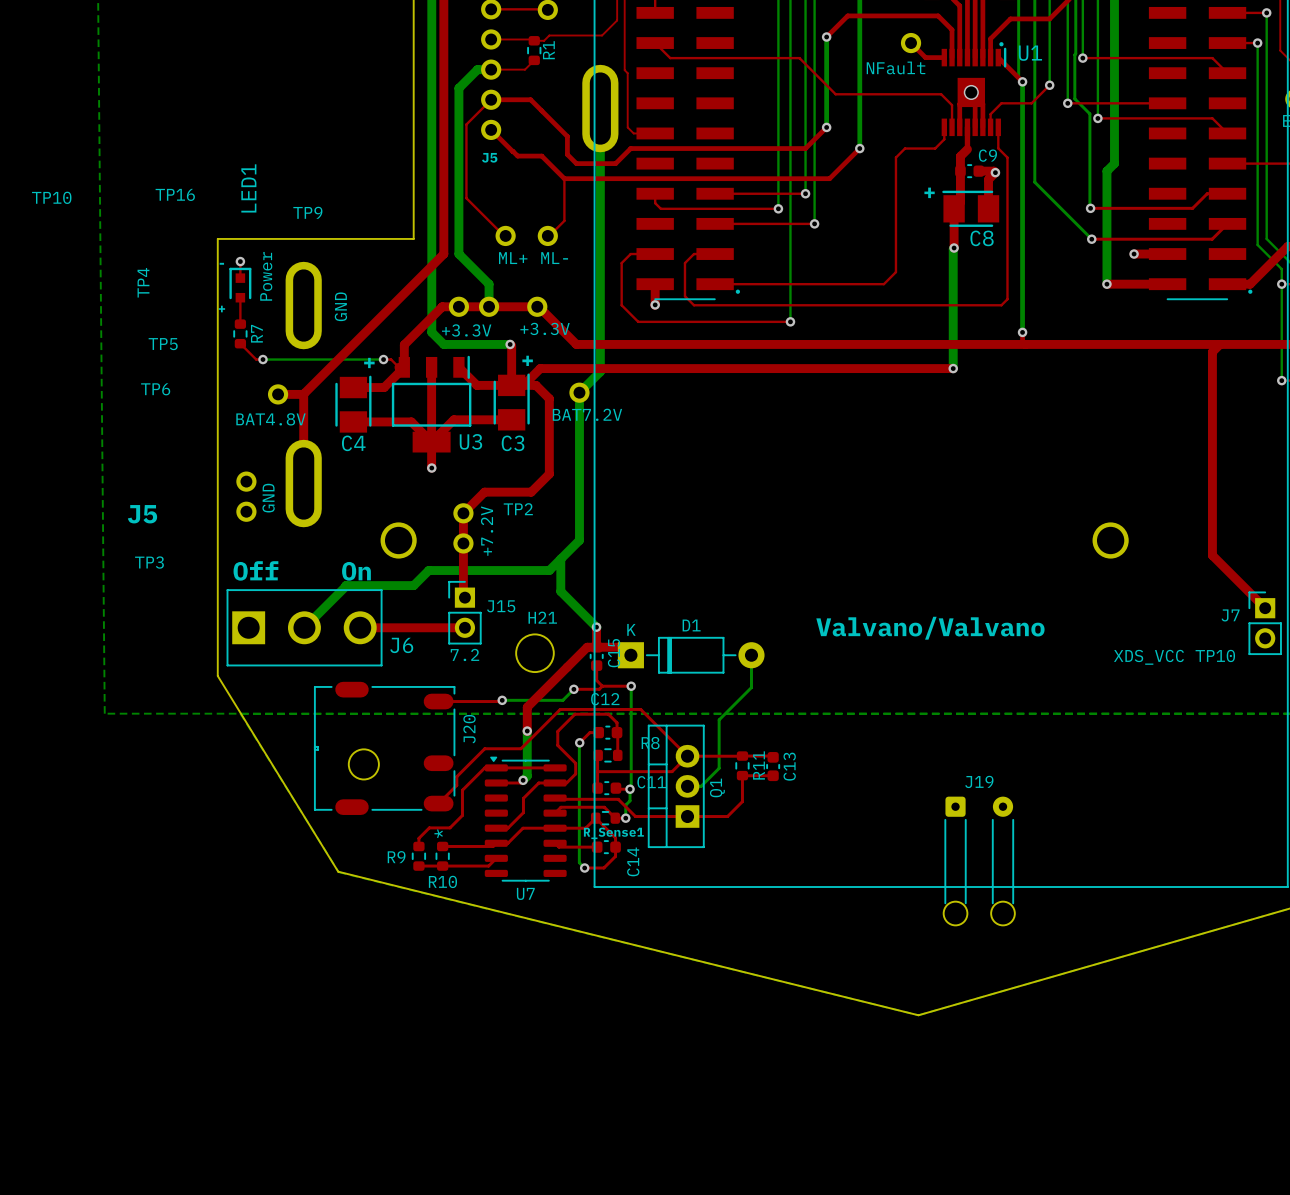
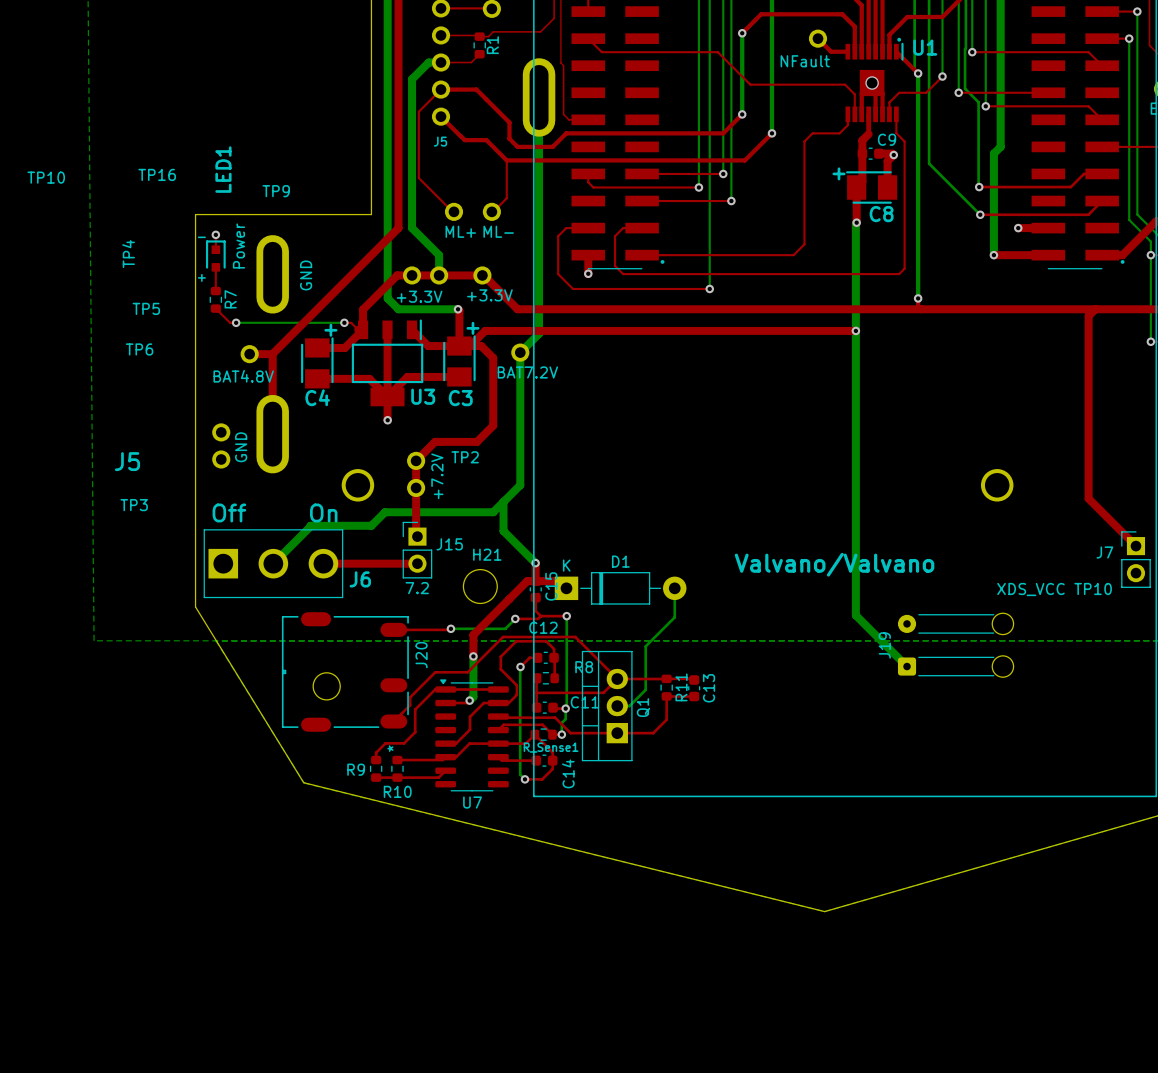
bottom track: none -> (855, 330) (855, 615) (907, 666)
J19 rotation: 0° (979, 861) -> 90° counterclockwise (955, 645)
J19 position: (979, 861) -> (955, 645)

